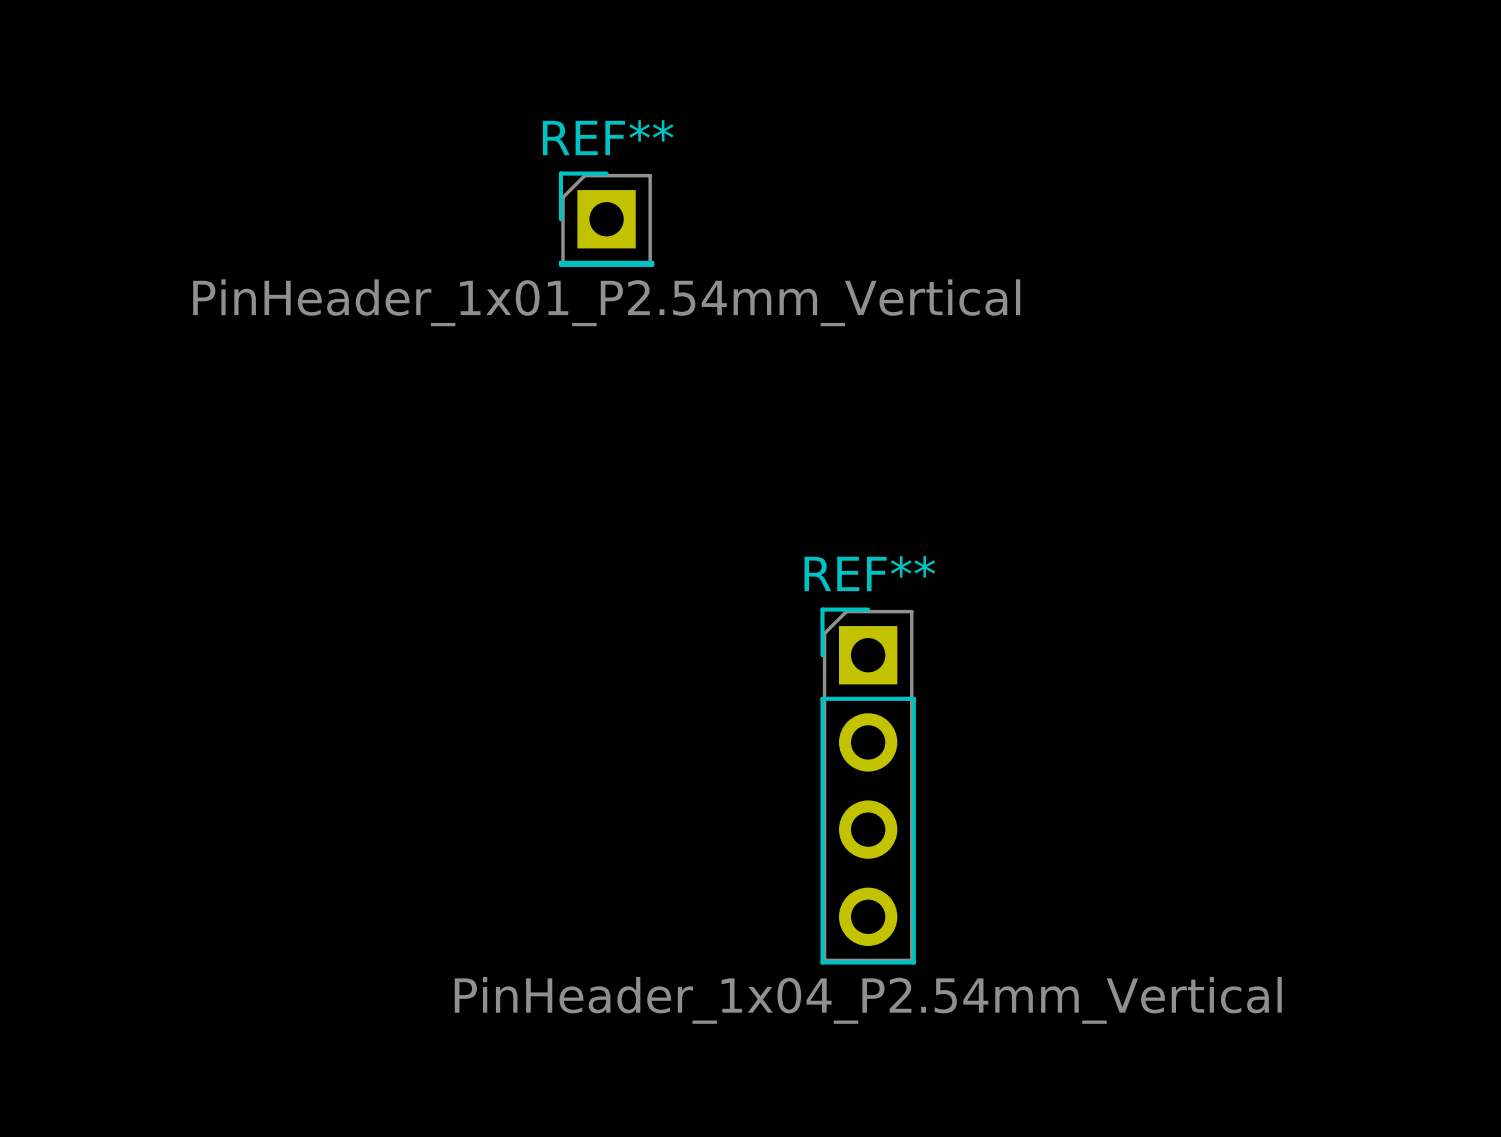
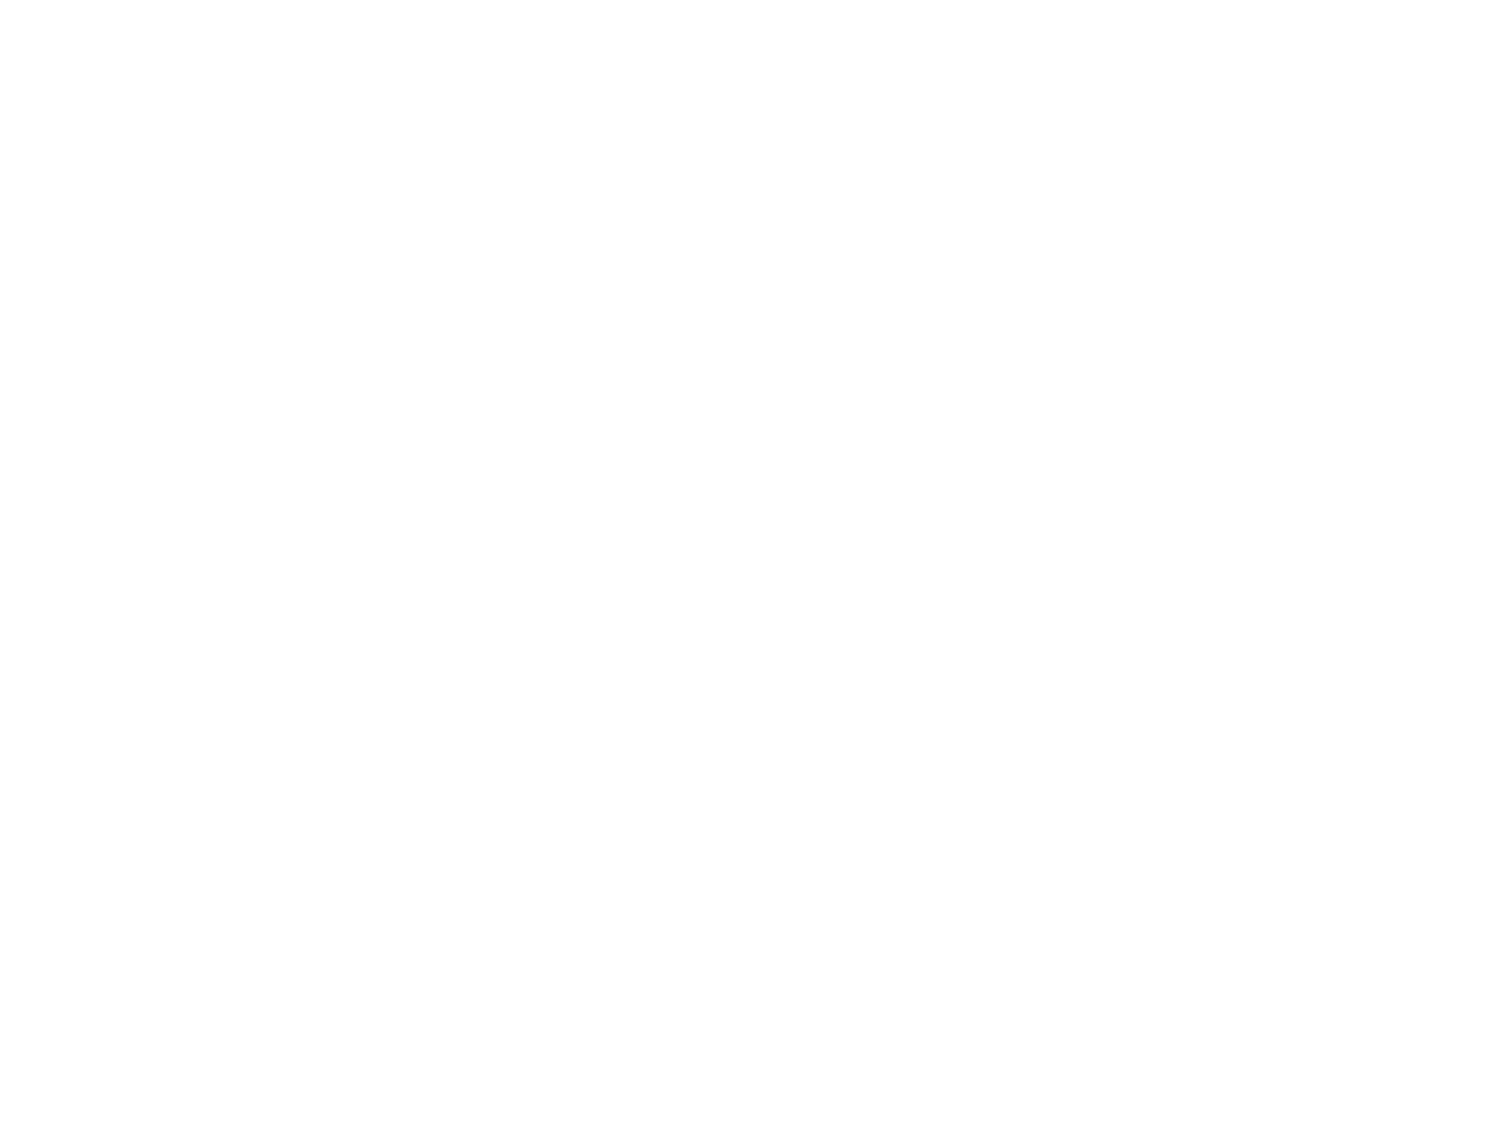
REF**: PinHeader_1x01_P2.54mm_Vertical (606, 219) -> none
REF**: PinHeader_1x04_P2.54mm_Vertical (868, 786) -> none

